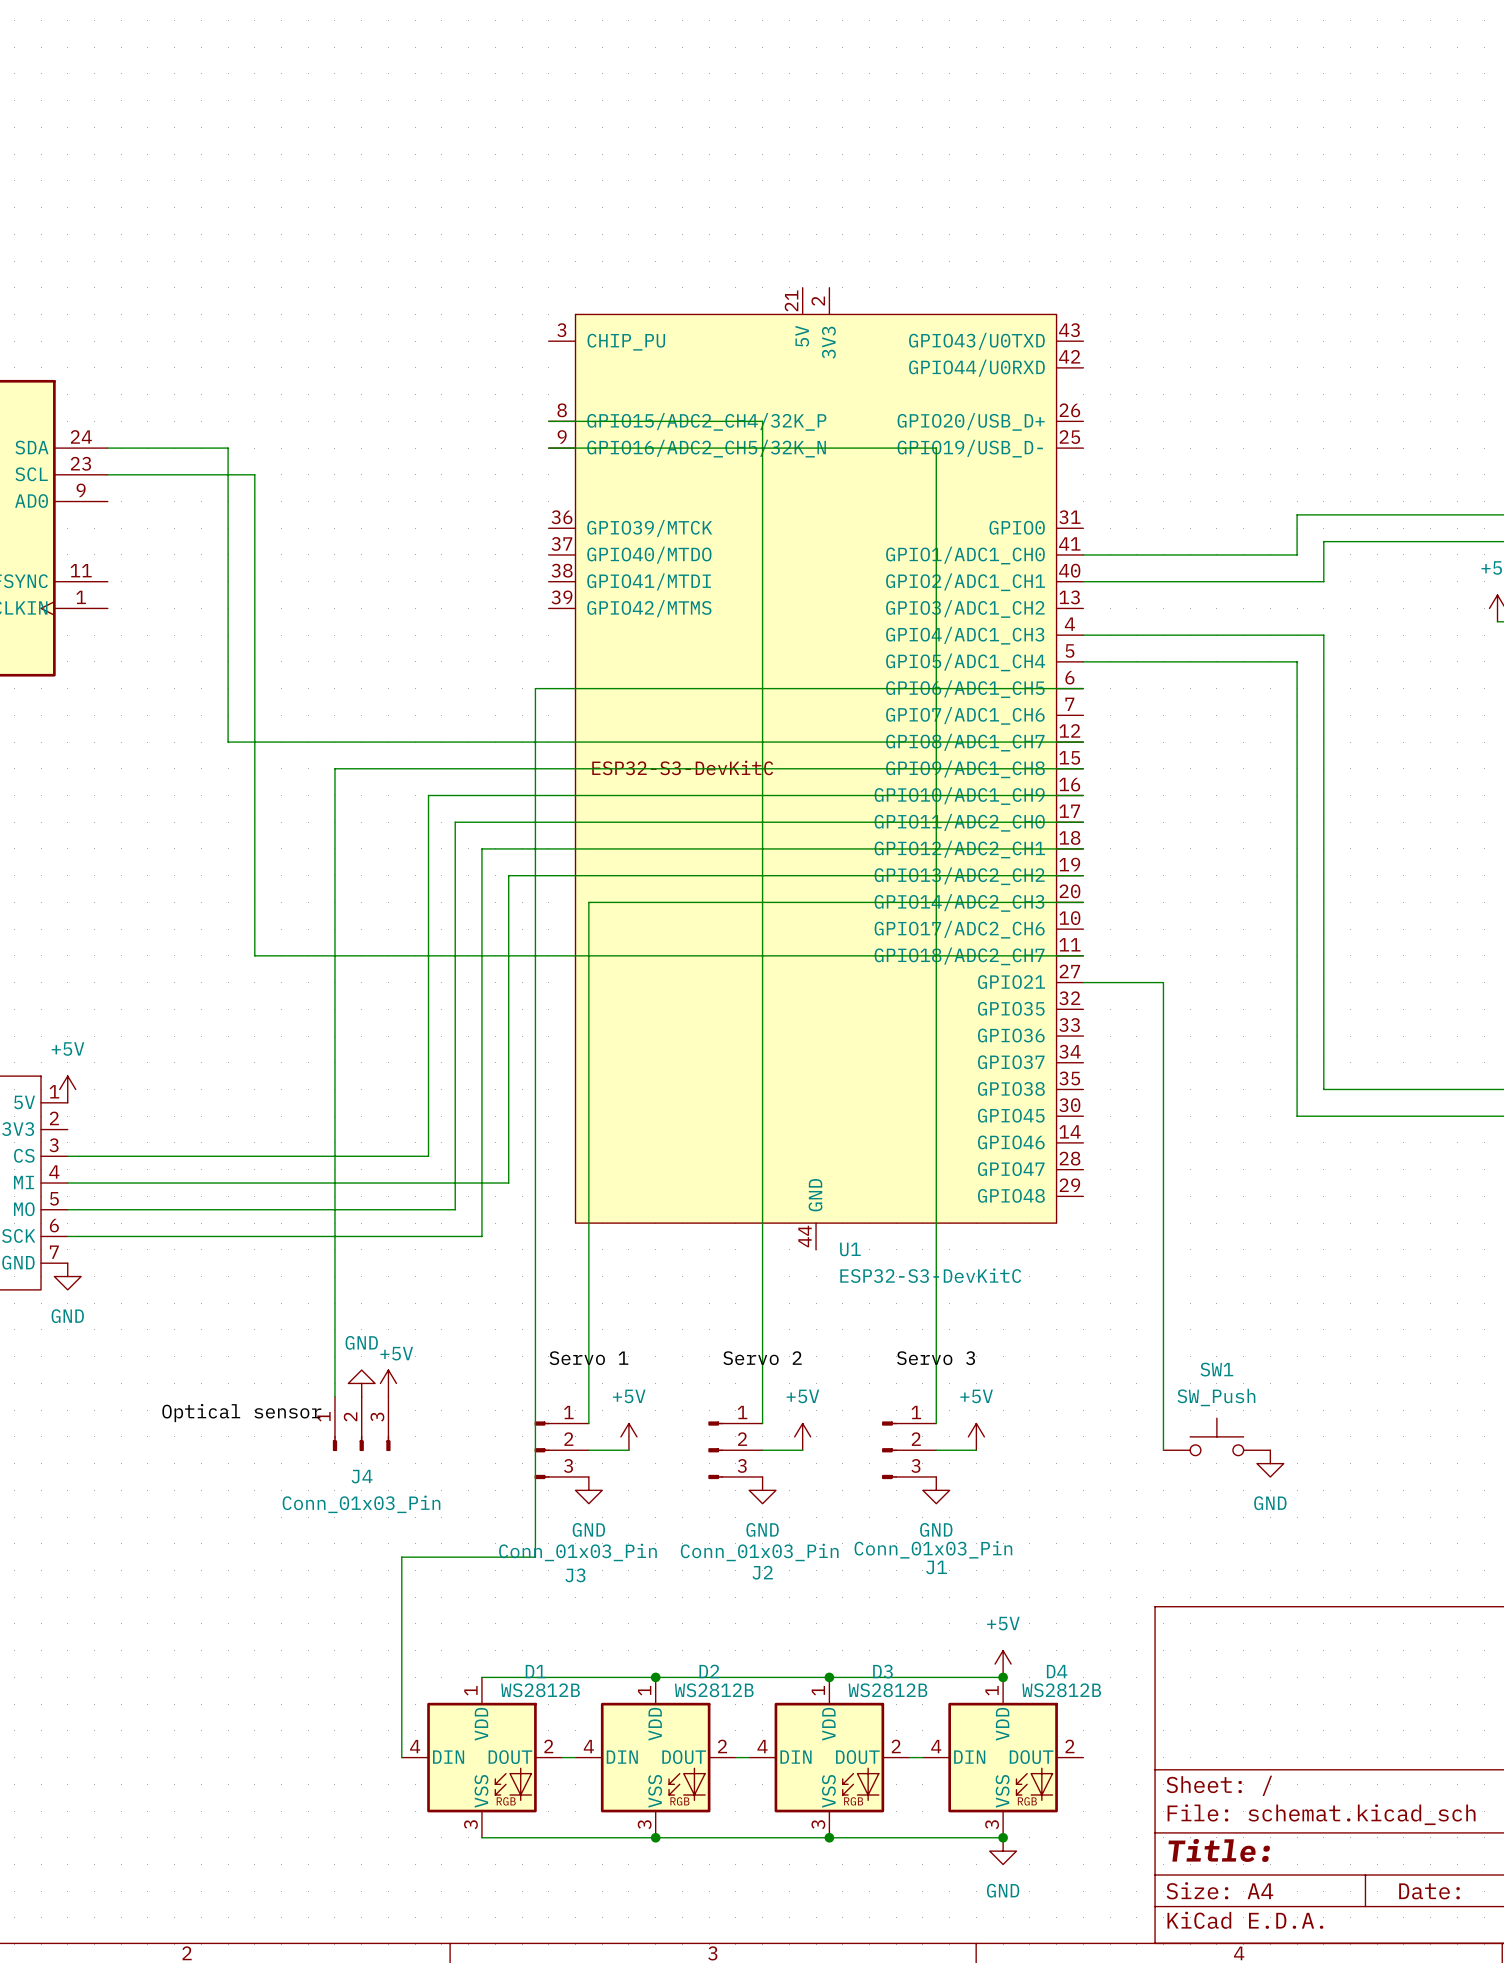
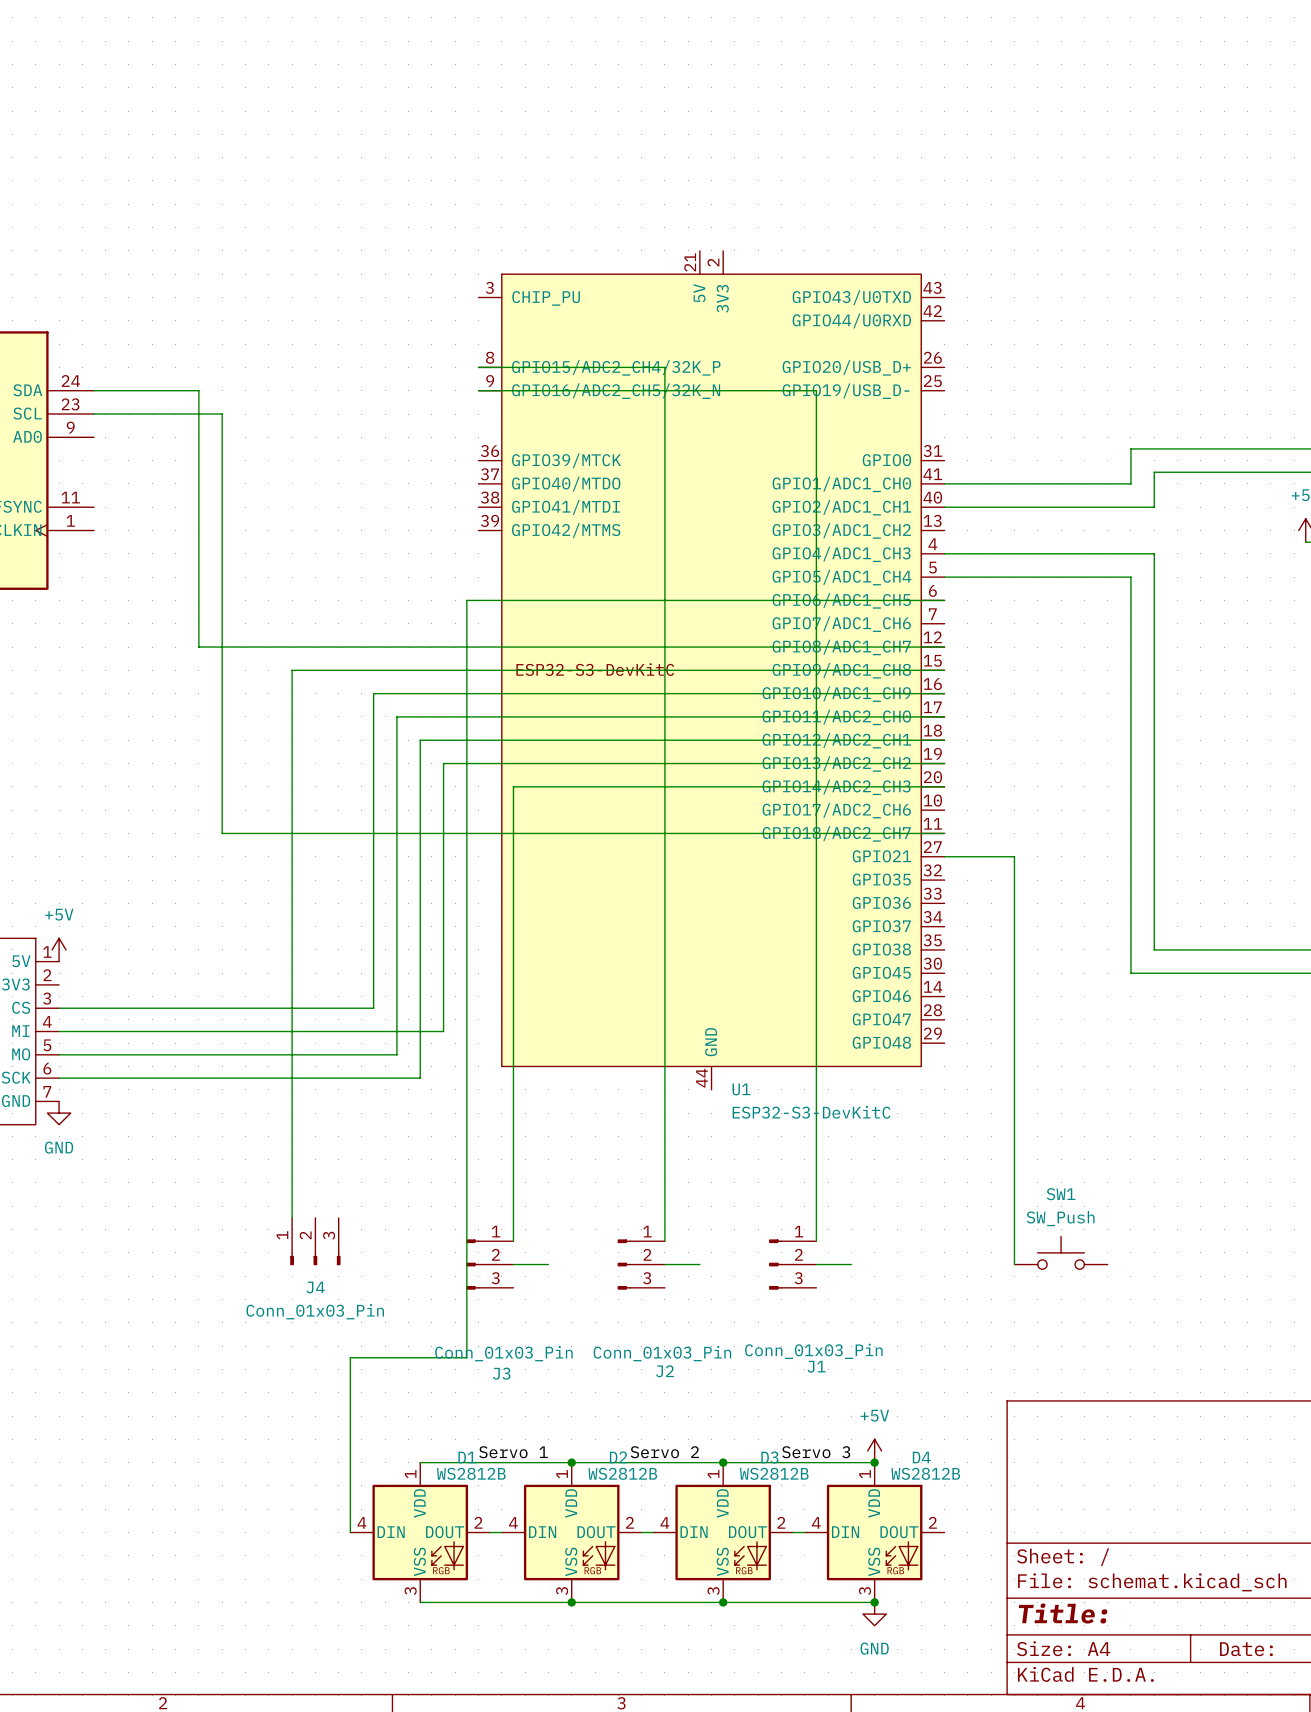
label: Servo 1 (588, 1358) -> none
label: Servo 2 (762, 1358) -> none
label: Servo 3 (936, 1358) -> none
power symbol: GND (361, 1383) -> none
power symbol: +5V (388, 1383) -> none
label: Optical sensor (241, 1413) -> none
power symbol: +5V (628, 1436) -> none
power symbol: +5V (802, 1436) -> none
power symbol: +5V (976, 1436) -> none
power symbol: GND (1270, 1463) -> none
power symbol: GND (588, 1490) -> none
power symbol: GND (762, 1490) -> none
power symbol: GND (936, 1490) -> none
label: none -> Servo 1 (513, 1452)
label: none -> Servo 2 (664, 1452)
label: none -> Servo 3 (816, 1452)

